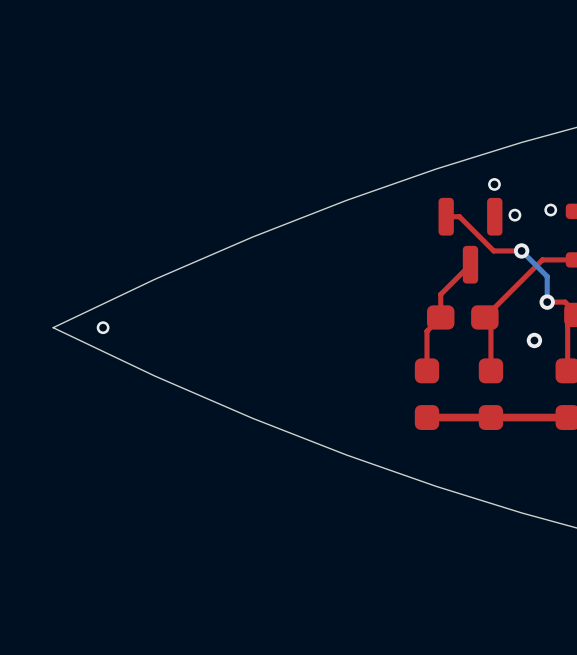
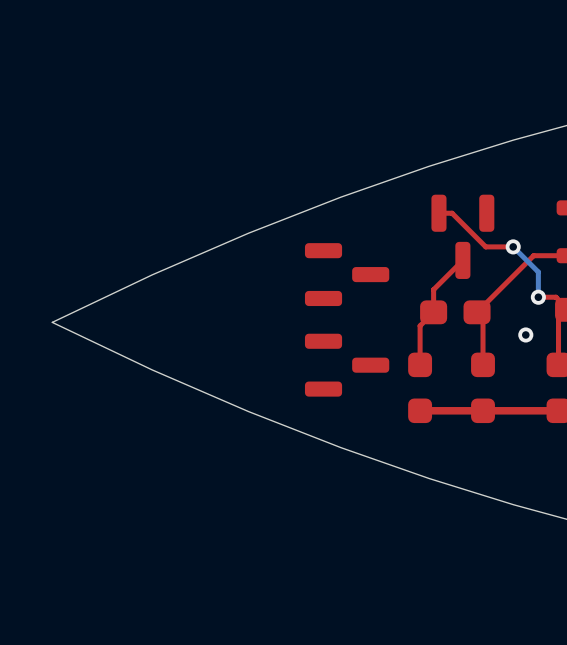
via: (494, 184) -> none
via: (550, 210) -> none
via: (514, 215) -> none
part: none -> (347, 274)
via: (103, 327) -> none
part: none -> (347, 365)

